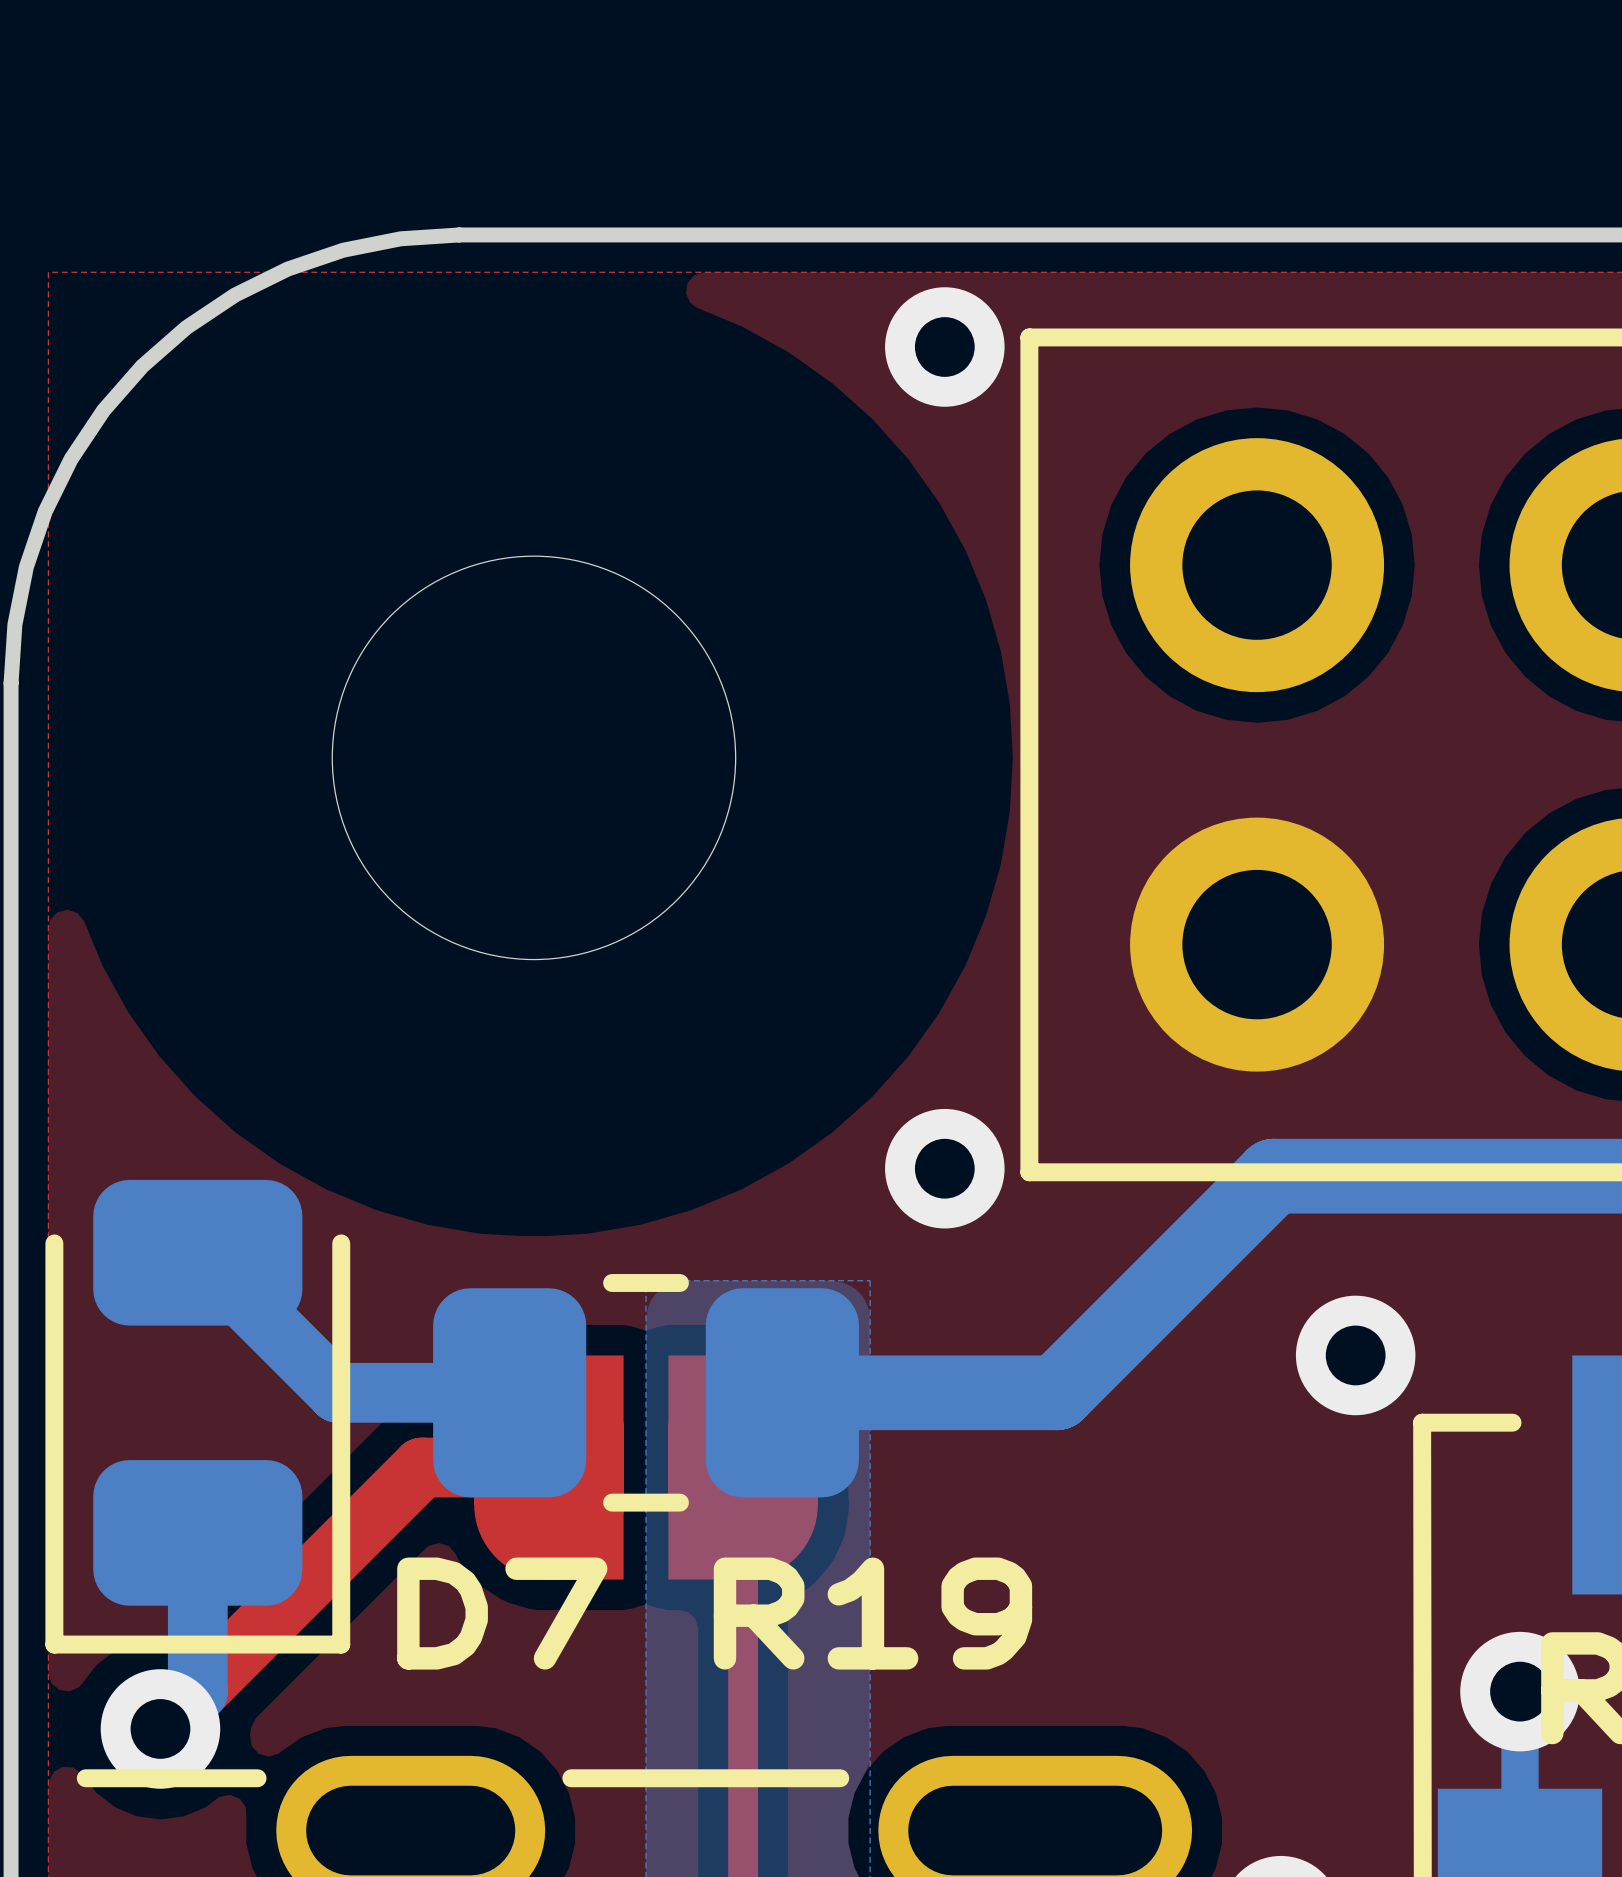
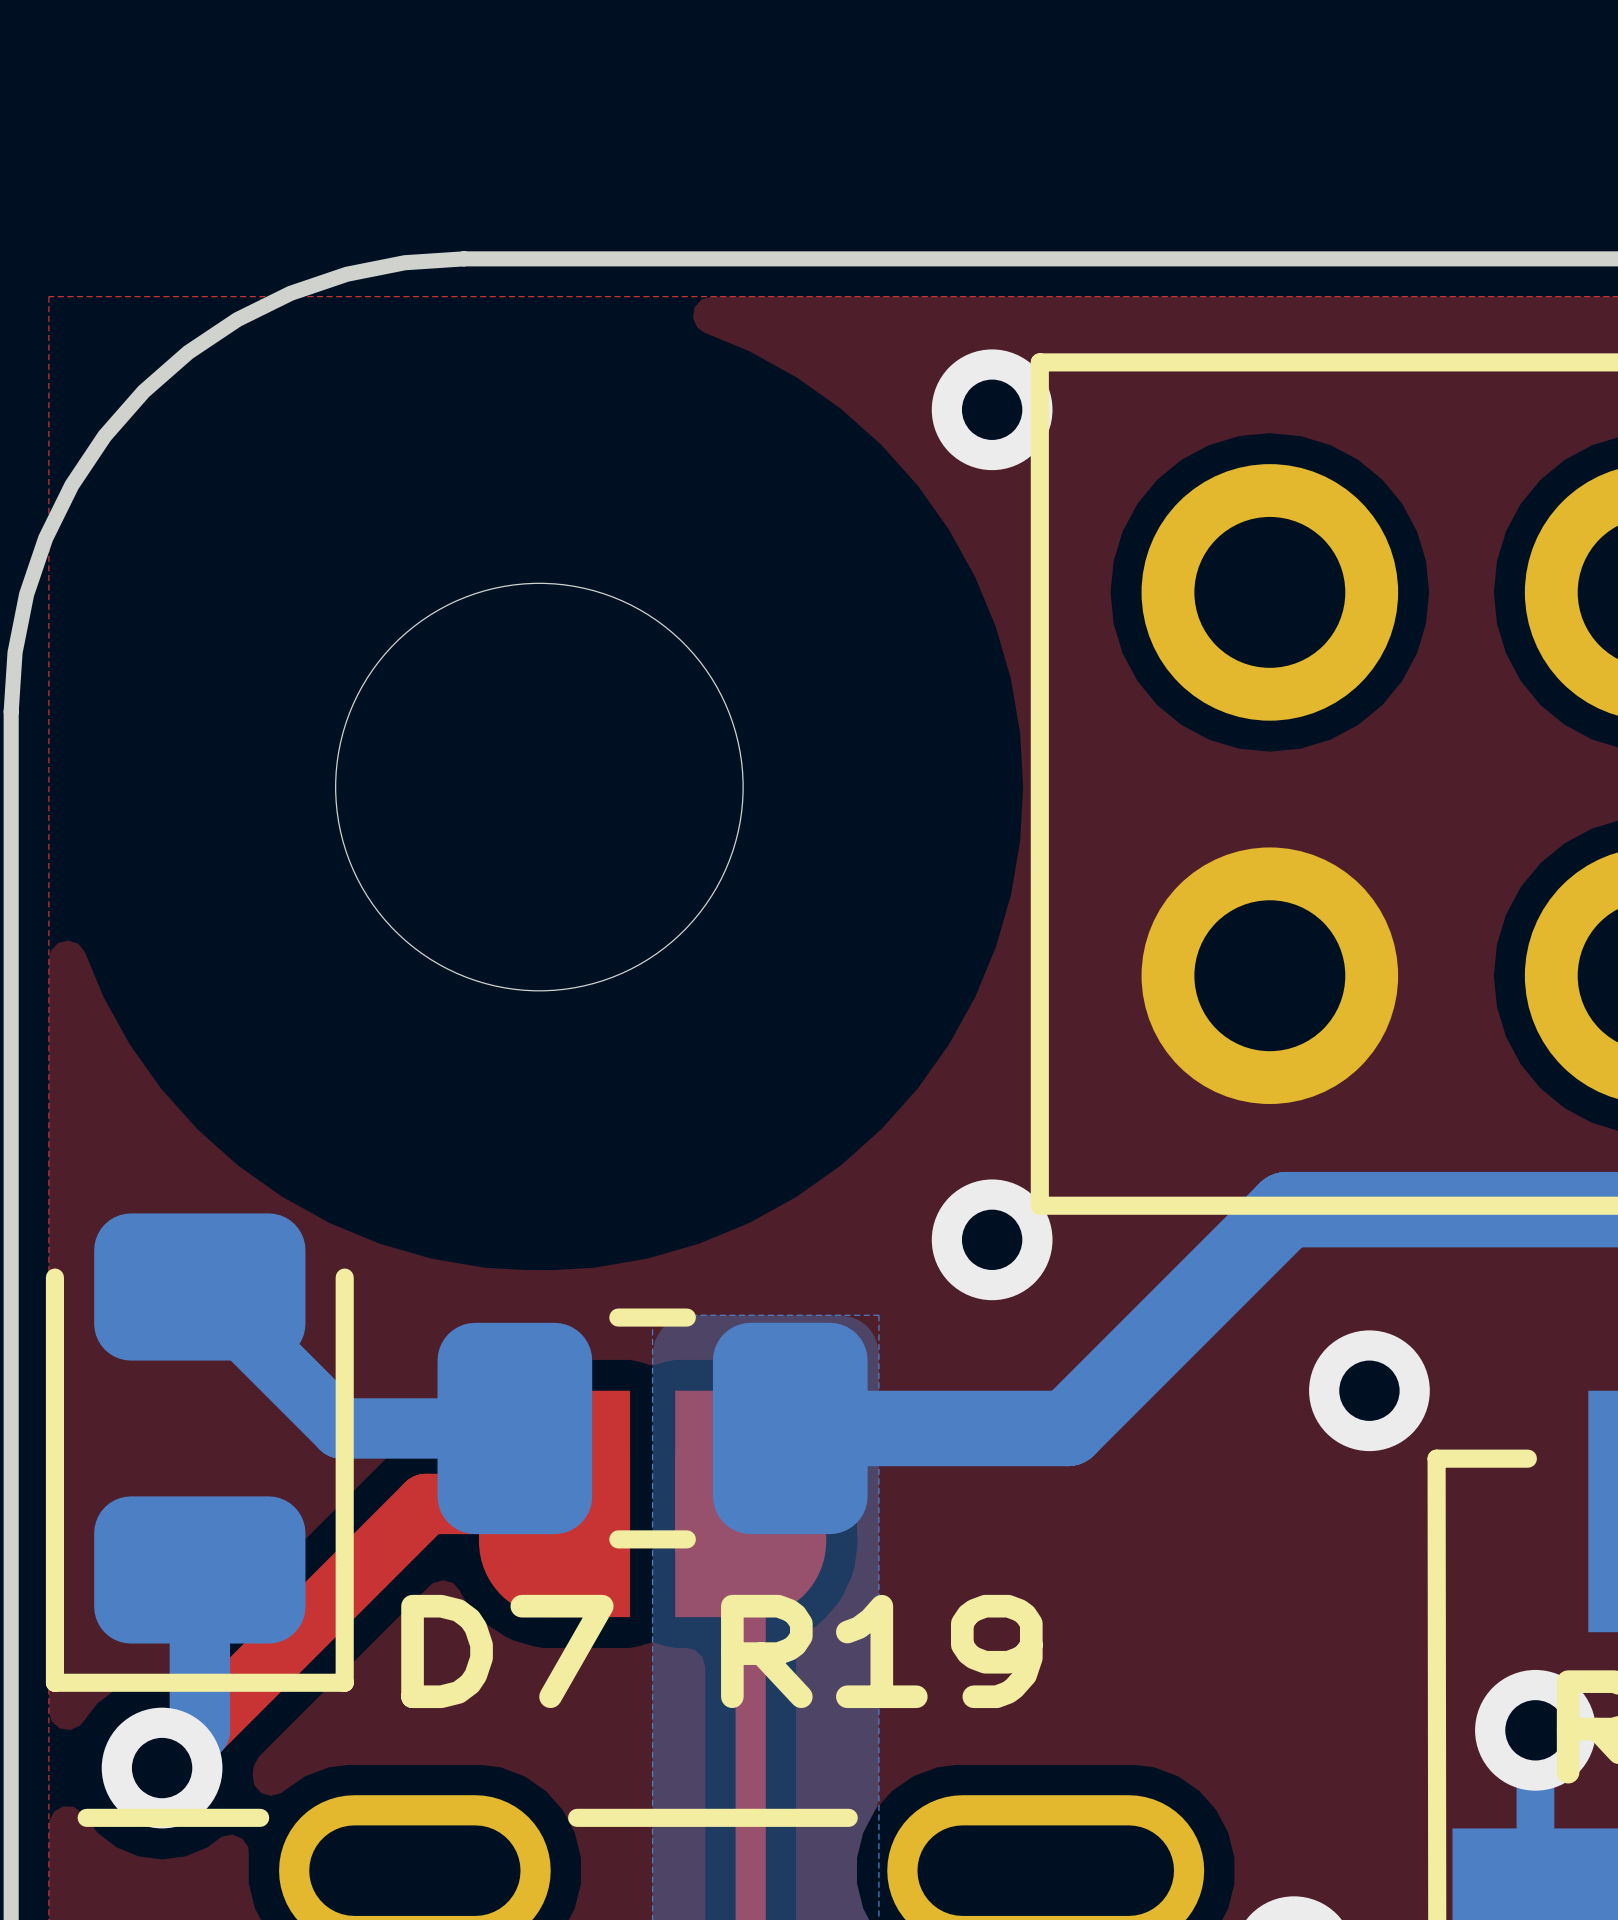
via position: (944, 347) -> (992, 409)
via position: (944, 1168) -> (992, 1239)

